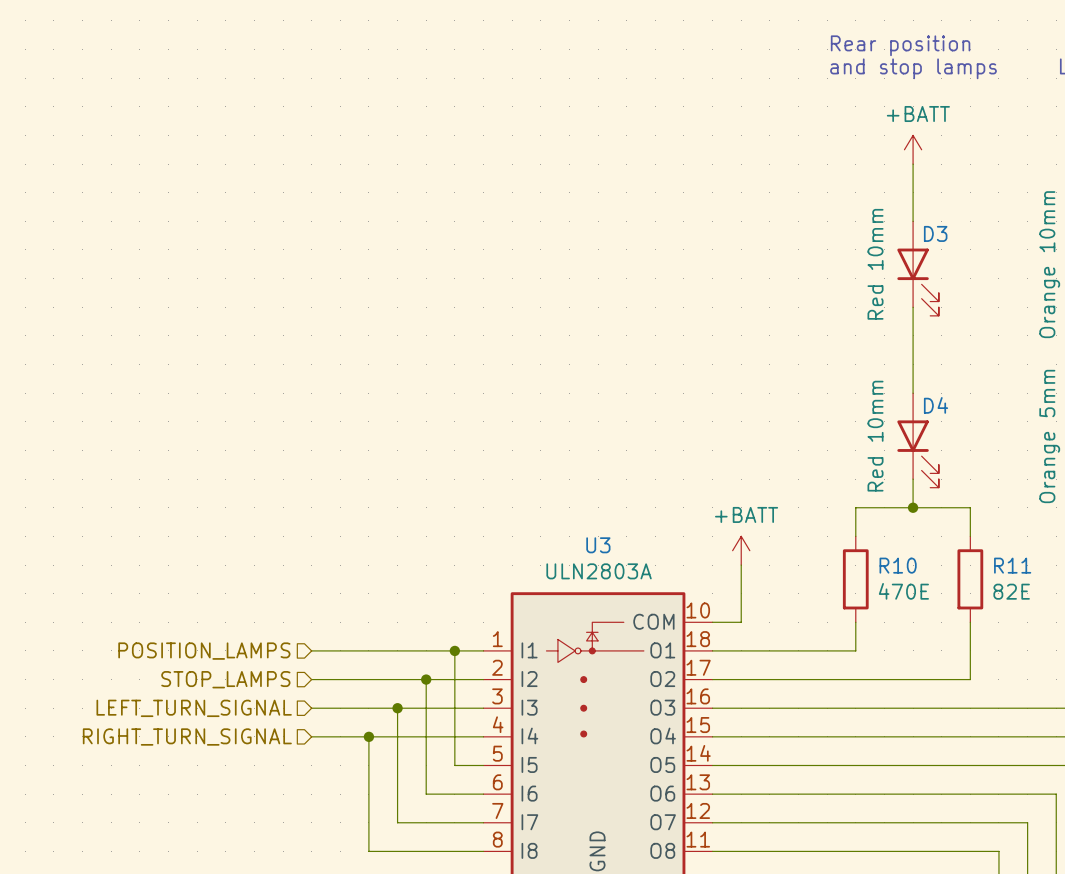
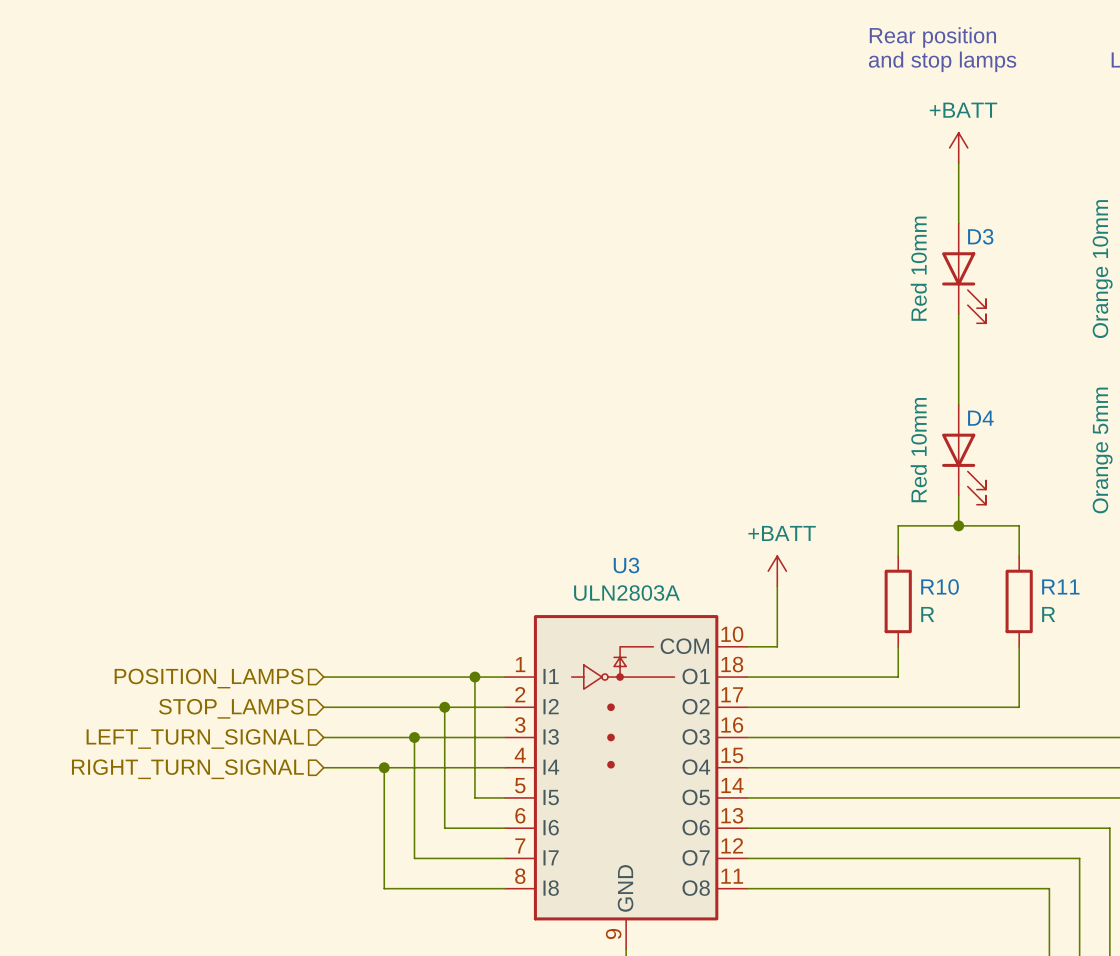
R10 value: 470E (903, 591) -> R (927, 614)
R11 value: 82E (1011, 591) -> R (1048, 614)

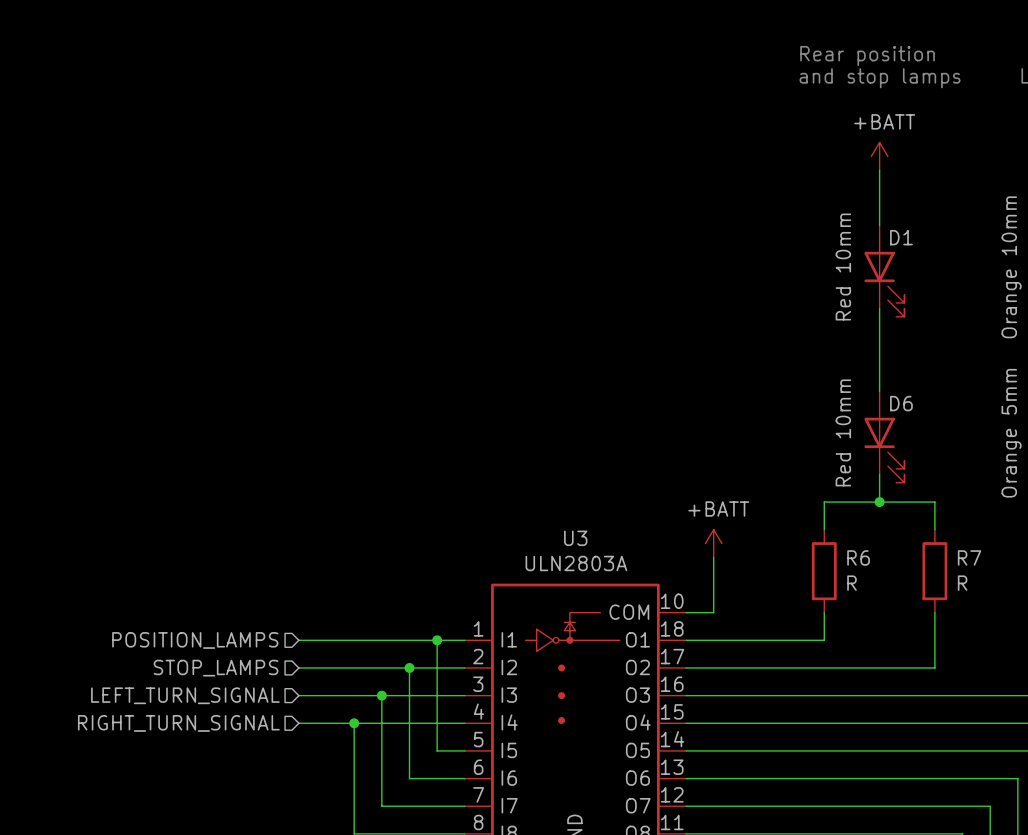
D3 name: D3 (980, 236) -> D1 (901, 237)
D4 name: D4 (980, 418) -> D6 (901, 403)
R10 name: R10 (940, 586) -> R6 (858, 557)
R11 name: R11 (1060, 586) -> R7 (969, 557)

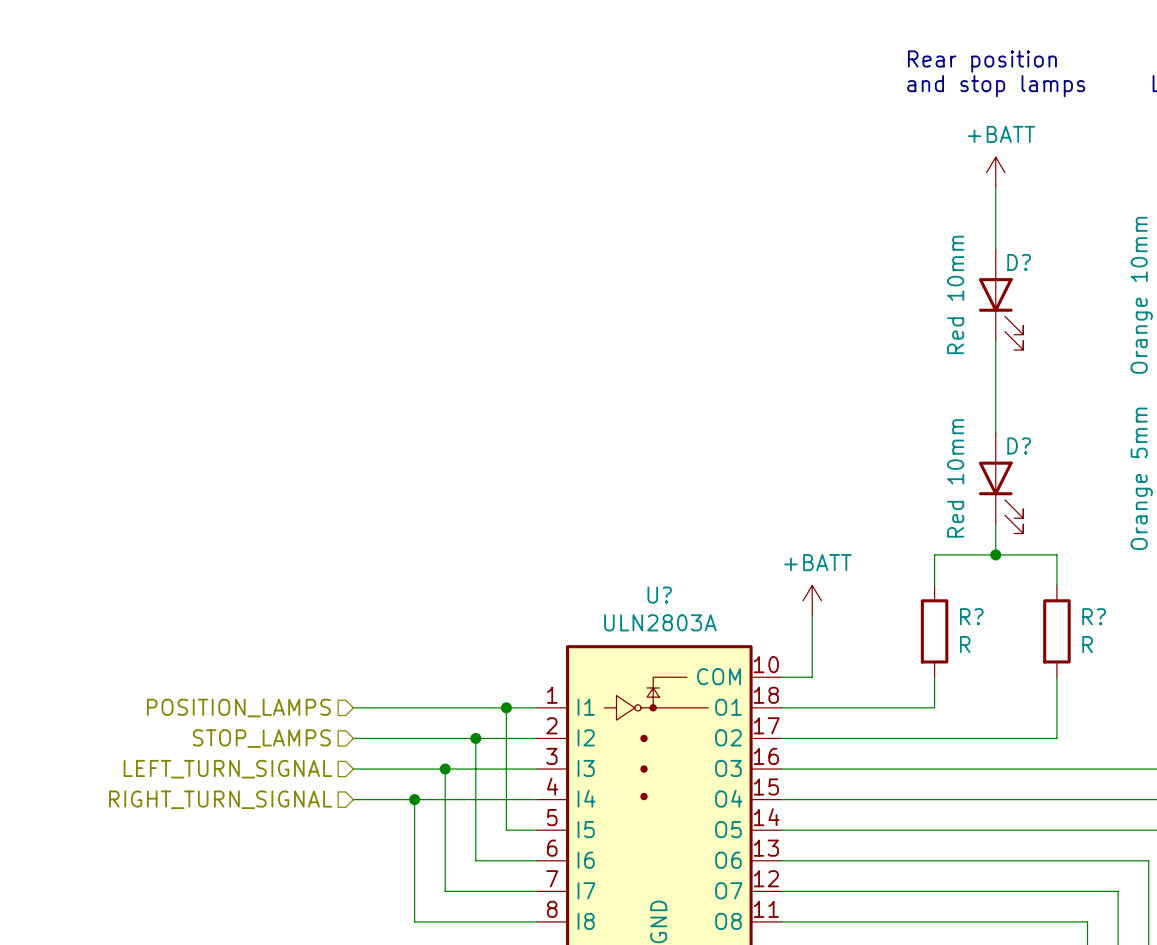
D1 name: D1 (901, 237) -> D? (1019, 262)
D6 name: D6 (901, 403) -> D? (1019, 446)
U3 name: U3 (575, 538) -> U? (659, 595)
R6 name: R6 (858, 557) -> R? (971, 616)
R7 name: R7 (969, 557) -> R? (1094, 616)

